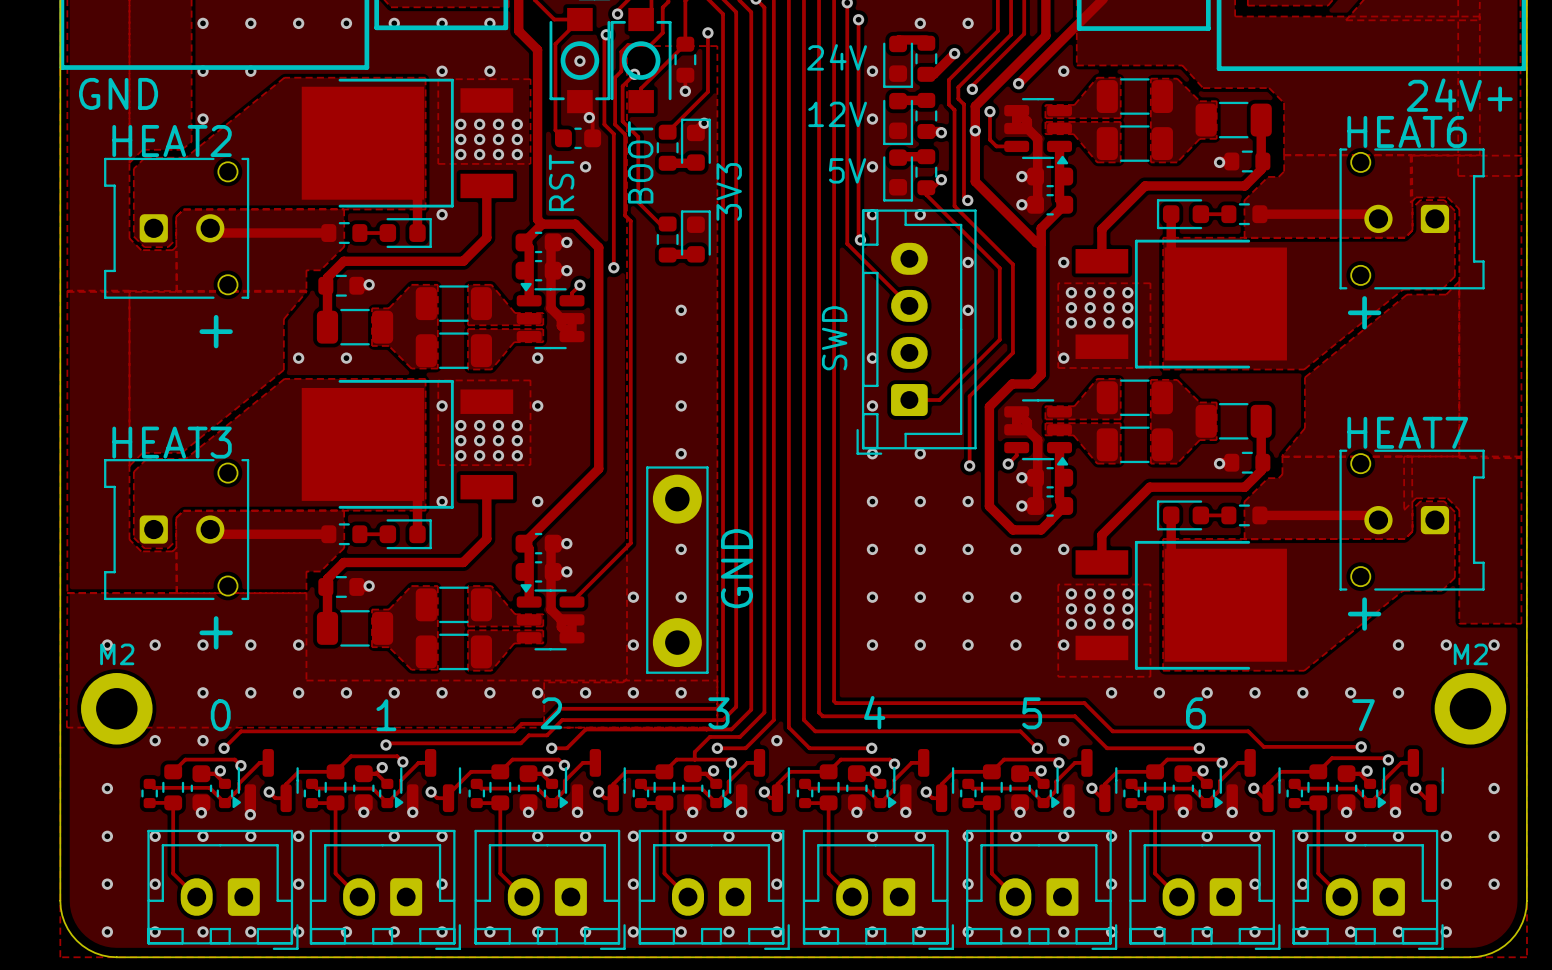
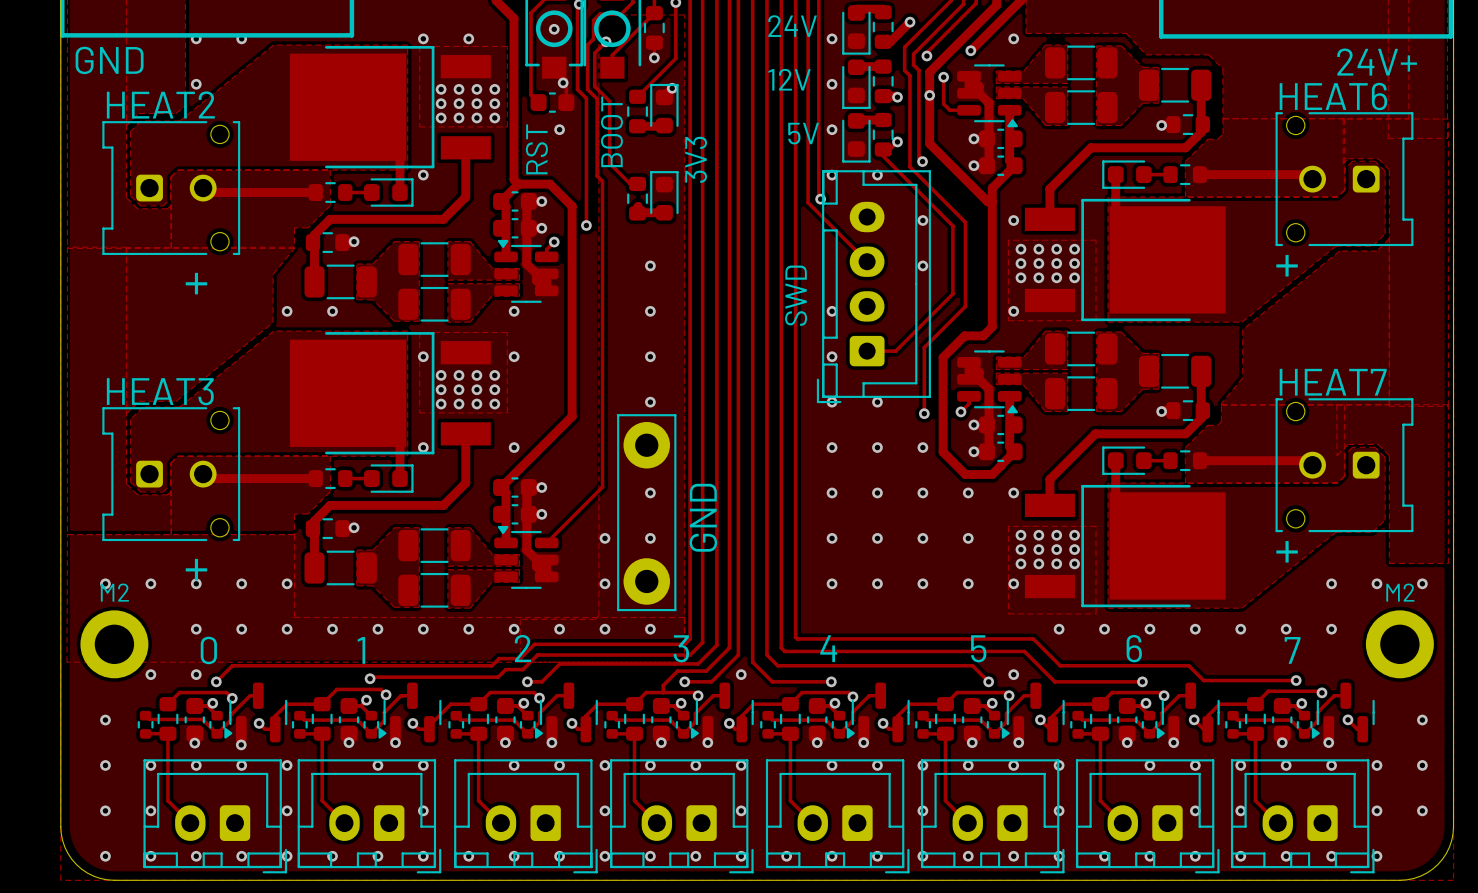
track: none -> (638, 206) (637, 206)

